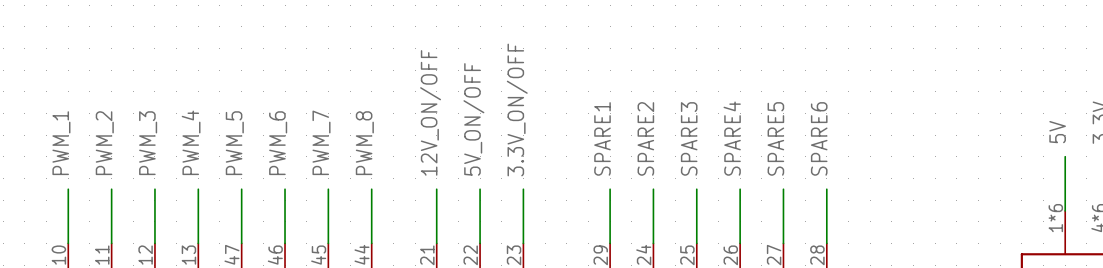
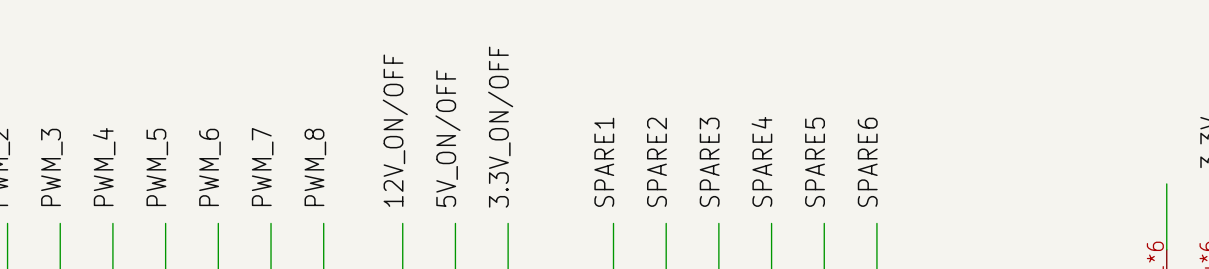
label: 5V (1057, 132) -> none

